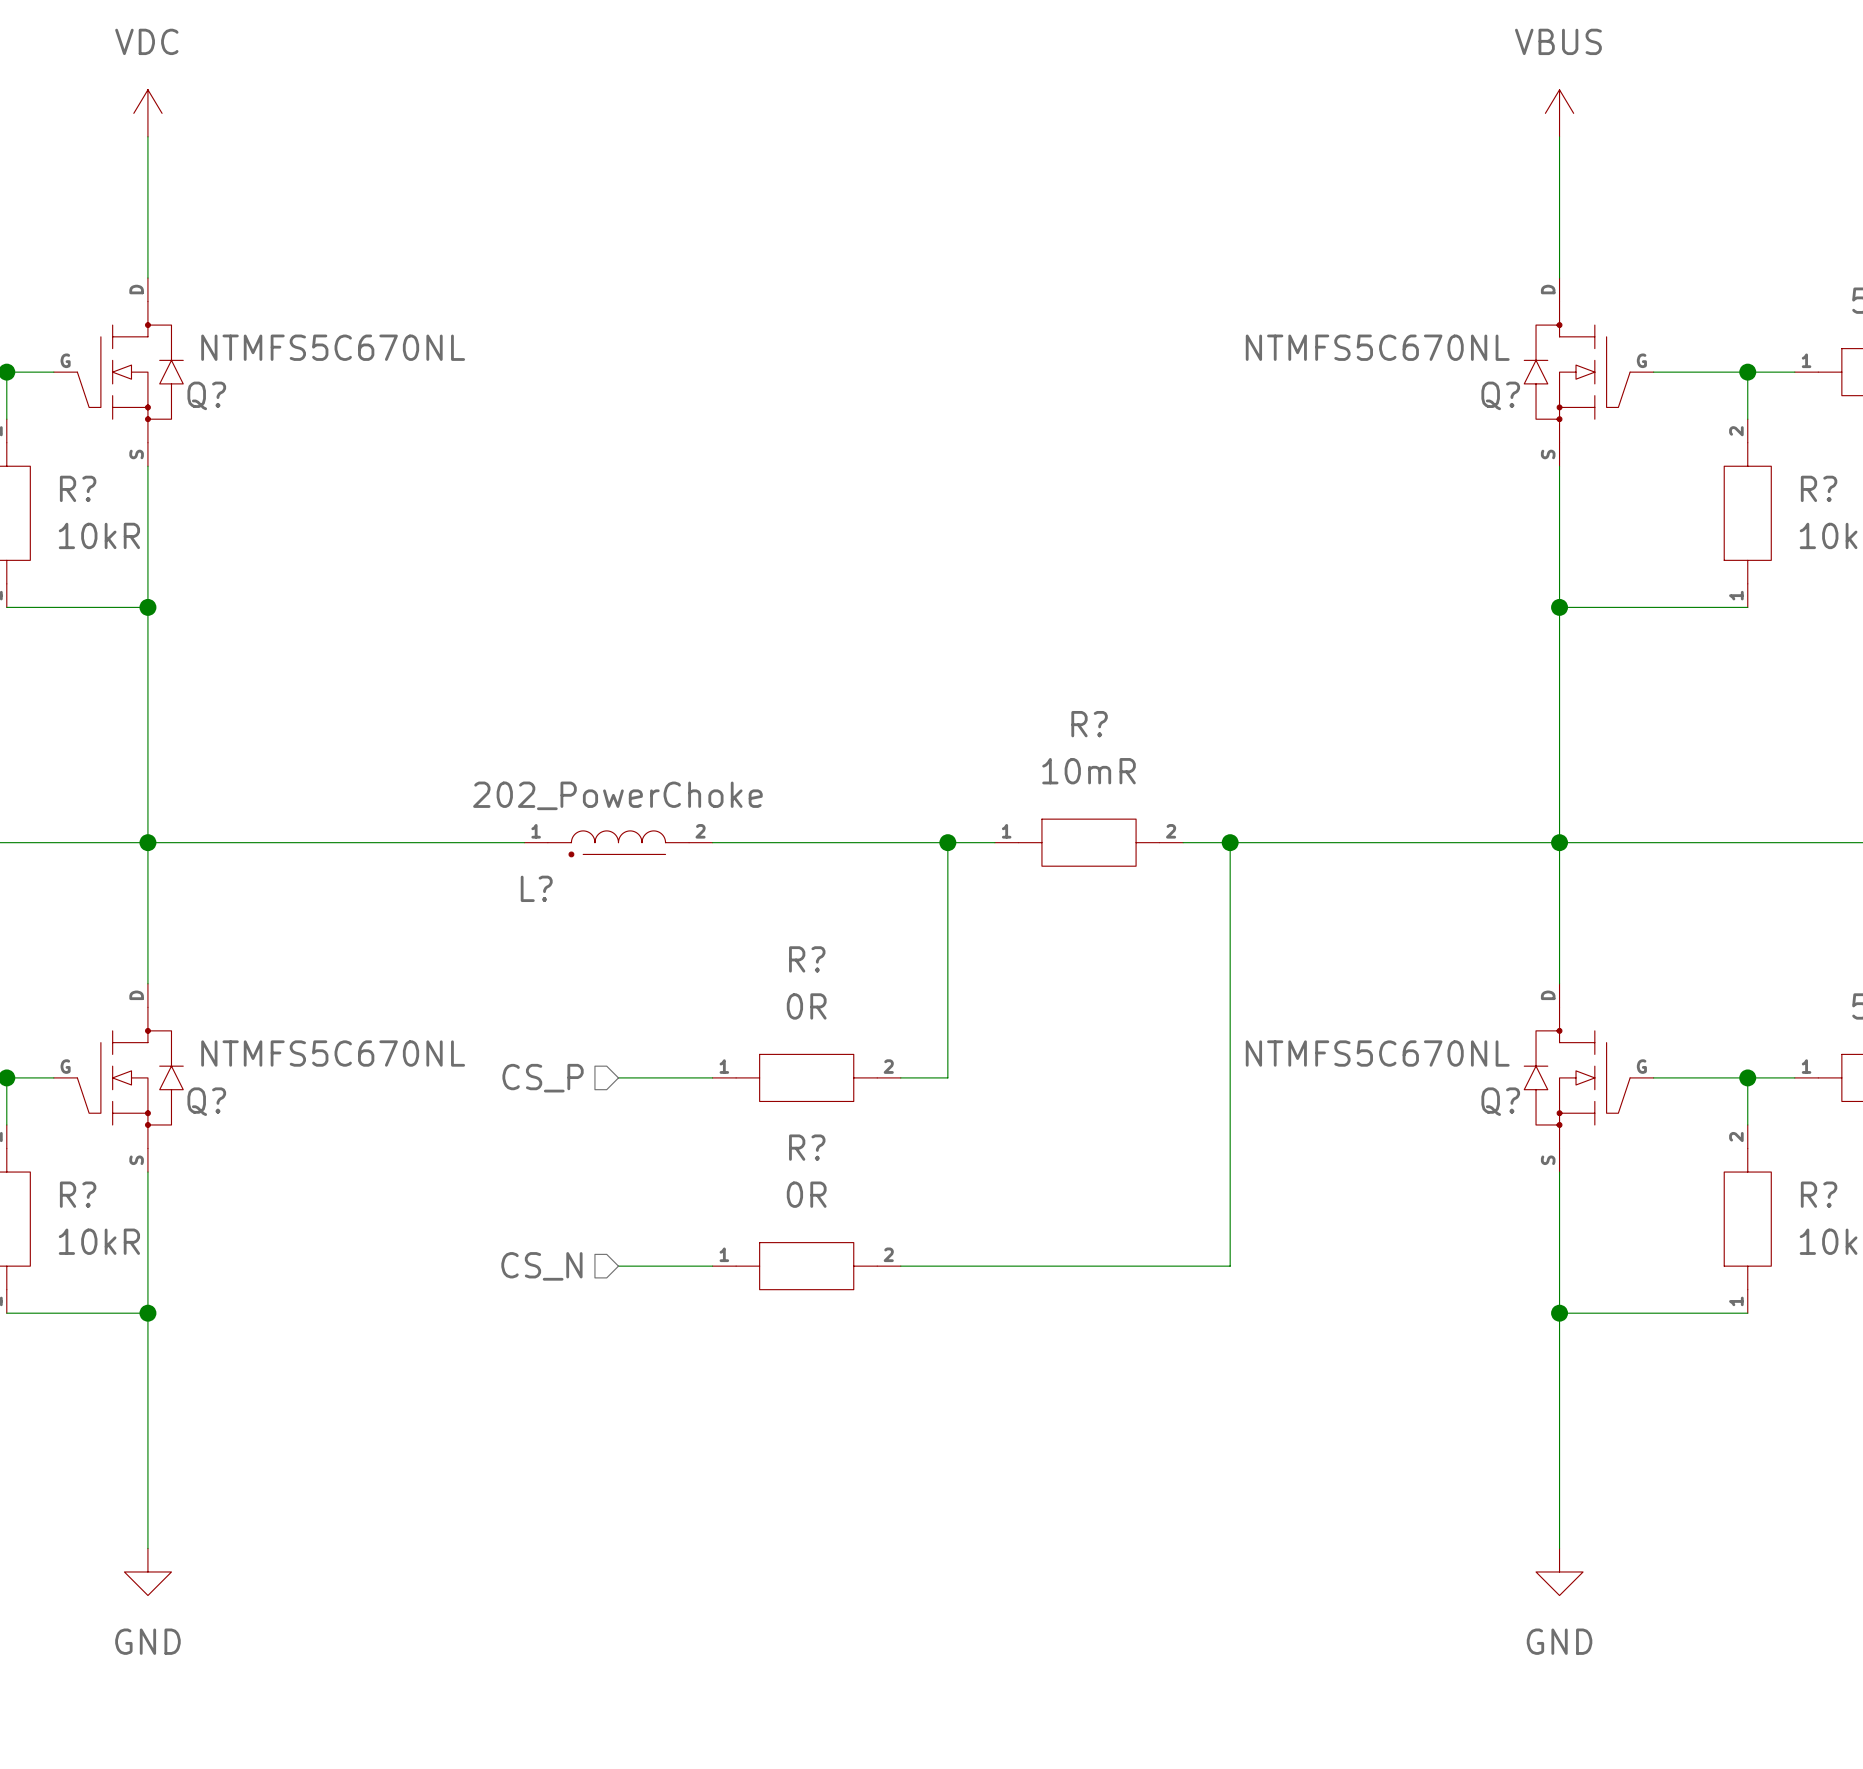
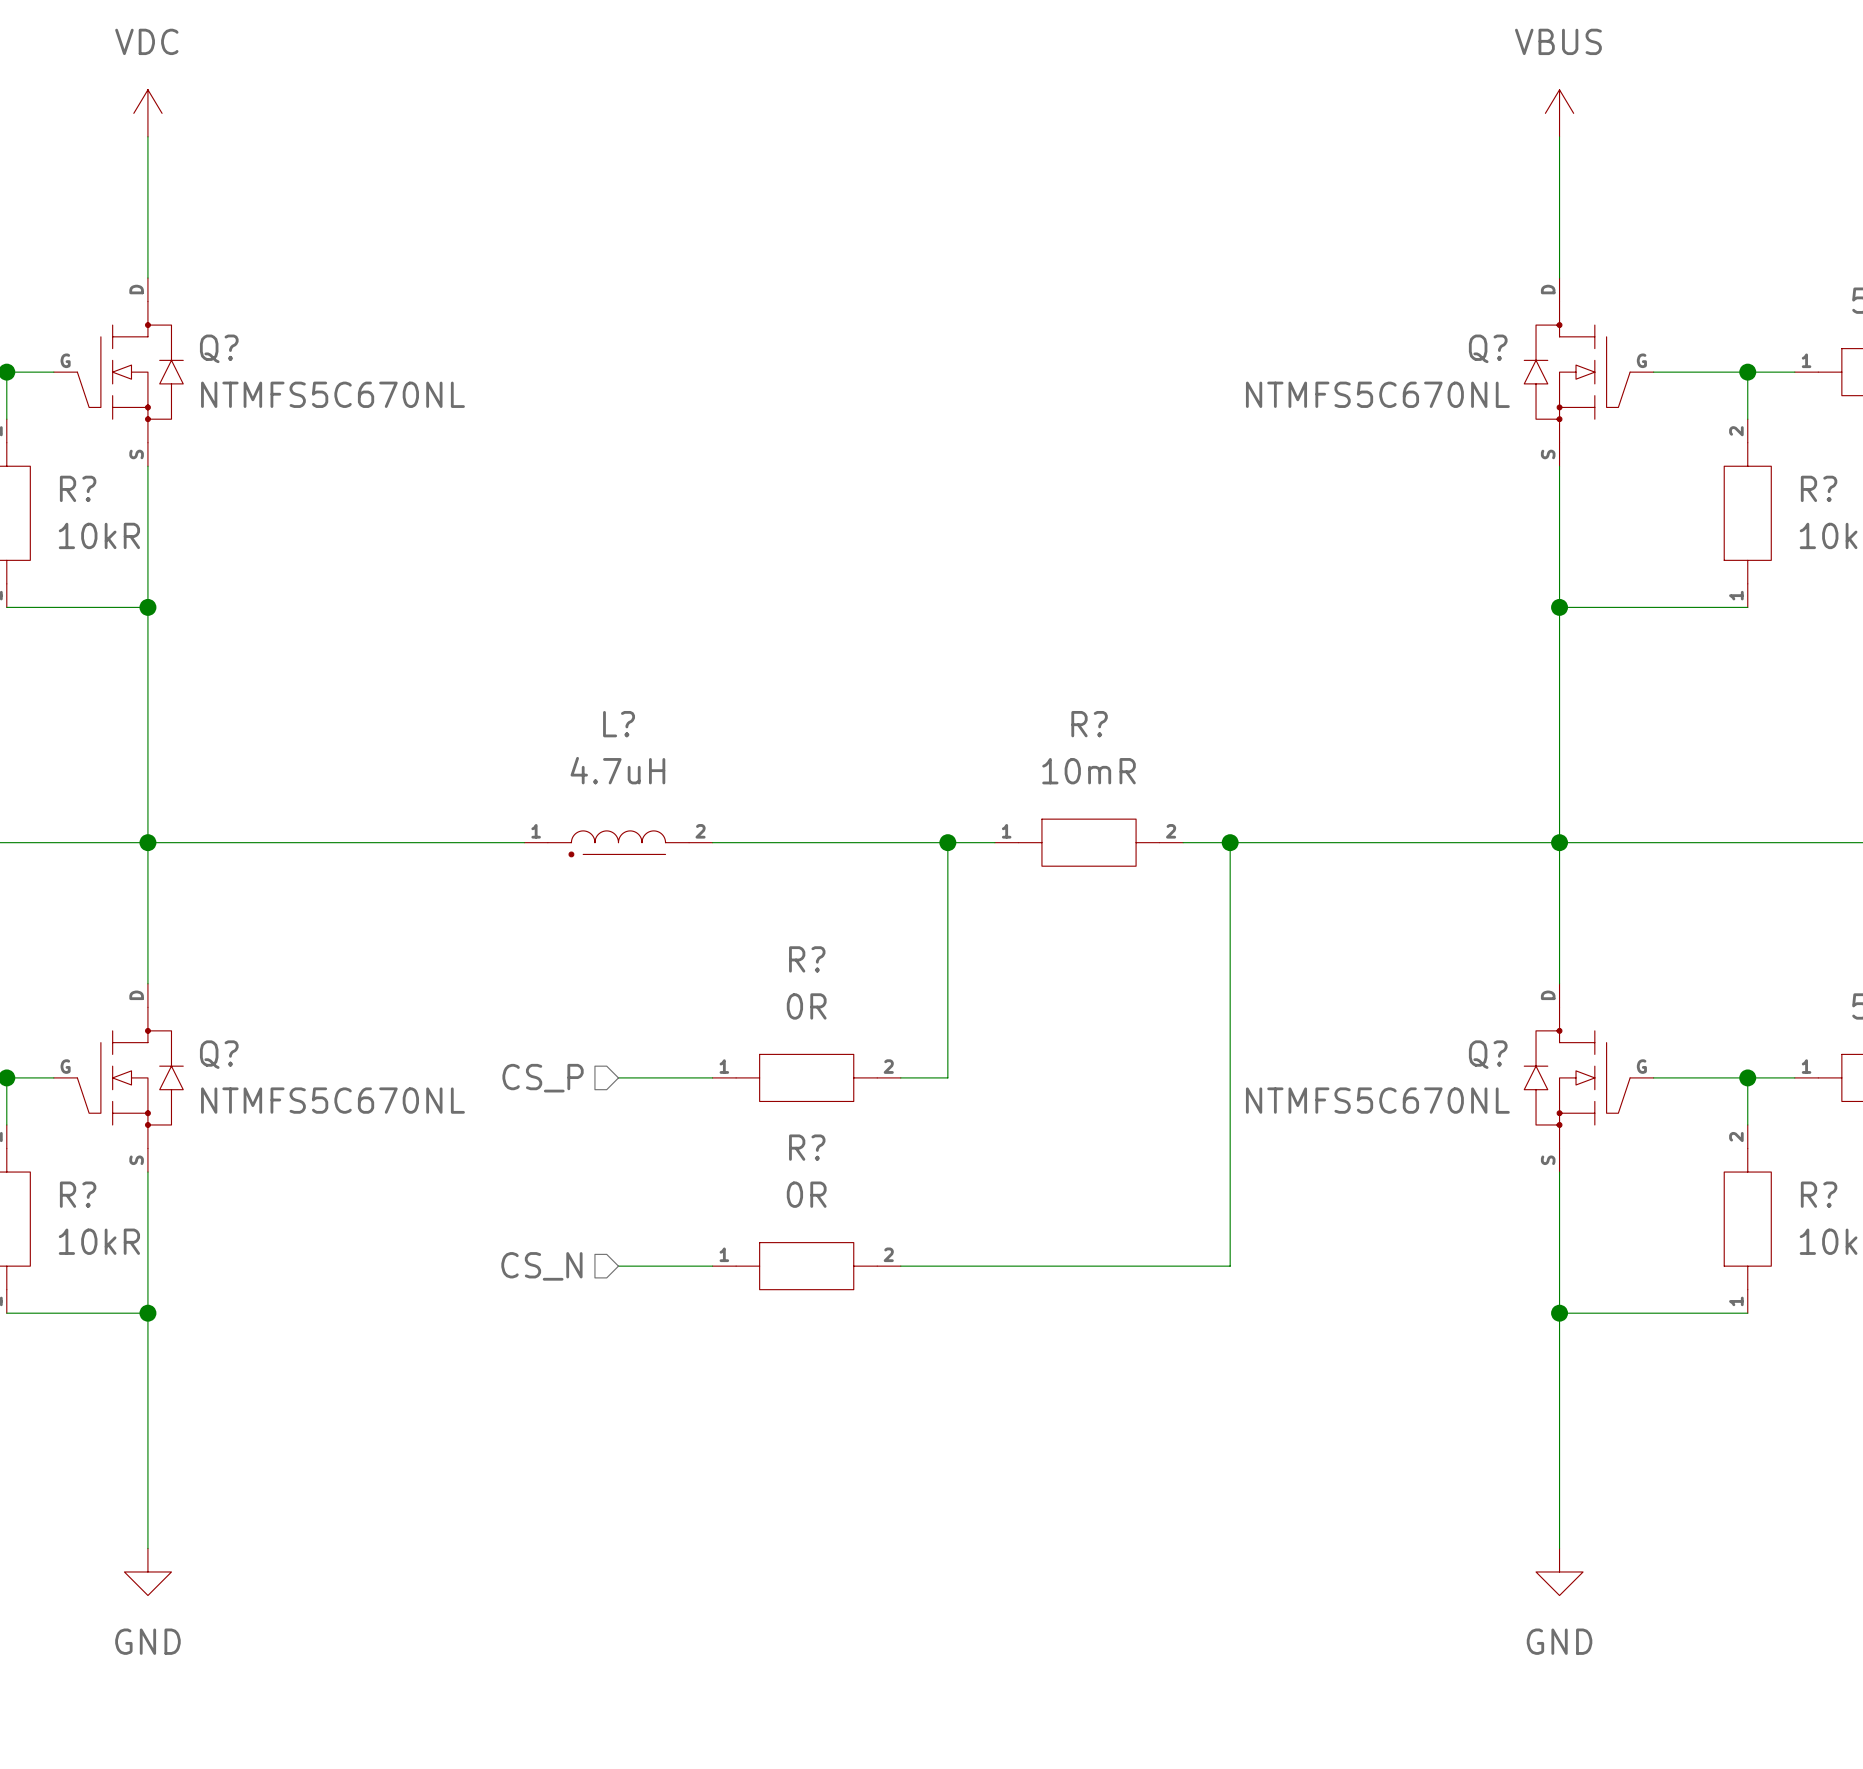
Q? value position: NTMFS5C670NL (333, 347) -> NTMFS5C670NL (332, 394)
Q? value position: NTMFS5C670NL (1377, 347) -> NTMFS5C670NL (1377, 394)
Q? name position: Q? (206, 395) -> Q? (219, 348)
Q? name position: Q? (1500, 395) -> Q? (1488, 348)
L? value: 202_PowerChoke (617, 795) -> 4.7uH (617, 770)
L? name position: L? (536, 888) -> L? (619, 724)
Q? value position: NTMFS5C670NL (333, 1053) -> NTMFS5C670NL (332, 1100)
Q? value position: NTMFS5C670NL (1377, 1053) -> NTMFS5C670NL (1377, 1100)
Q? name position: Q? (206, 1101) -> Q? (219, 1054)
Q? name position: Q? (1500, 1101) -> Q? (1488, 1054)

